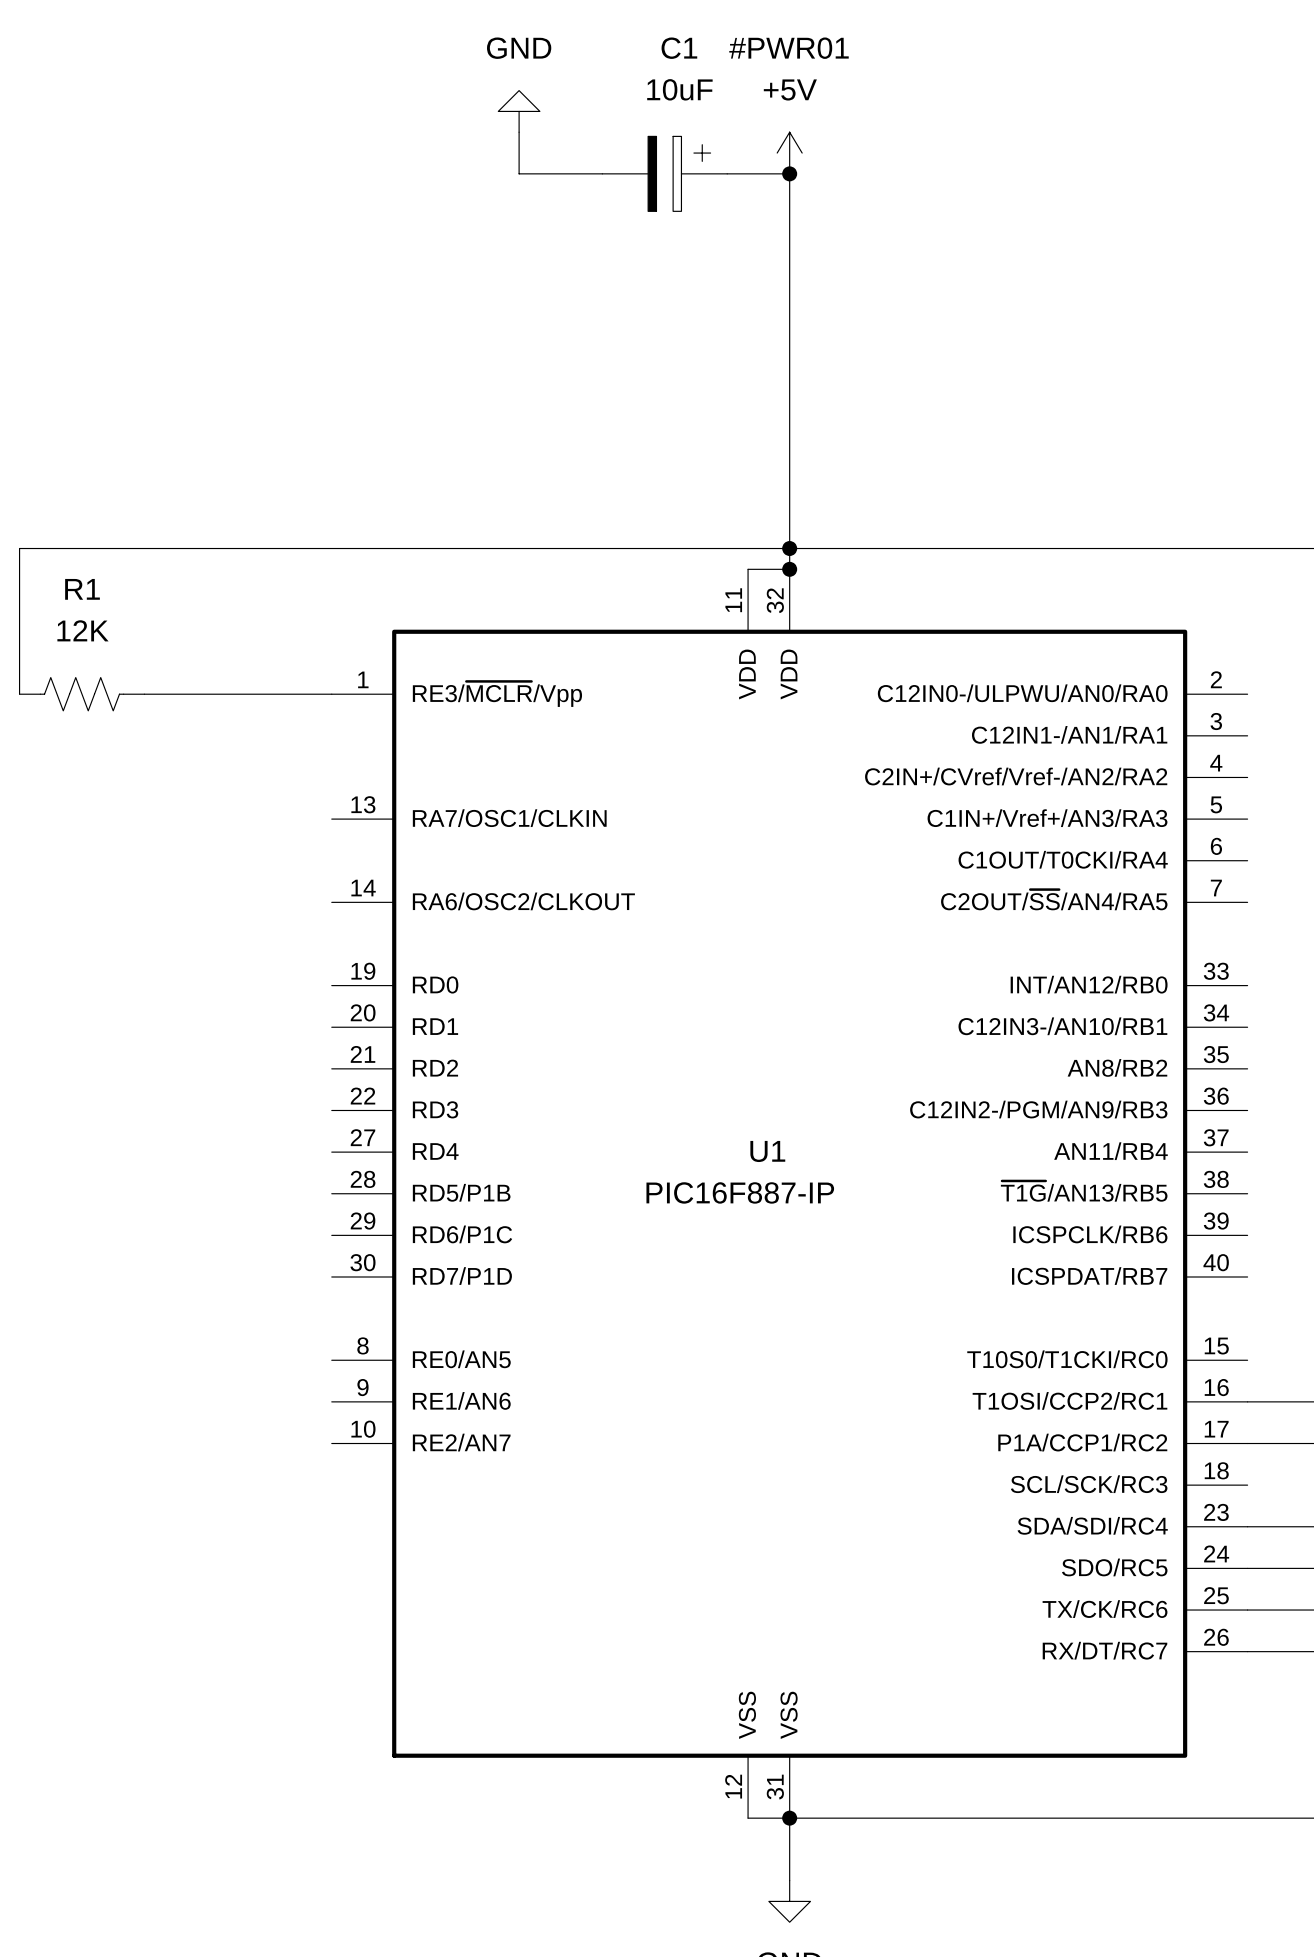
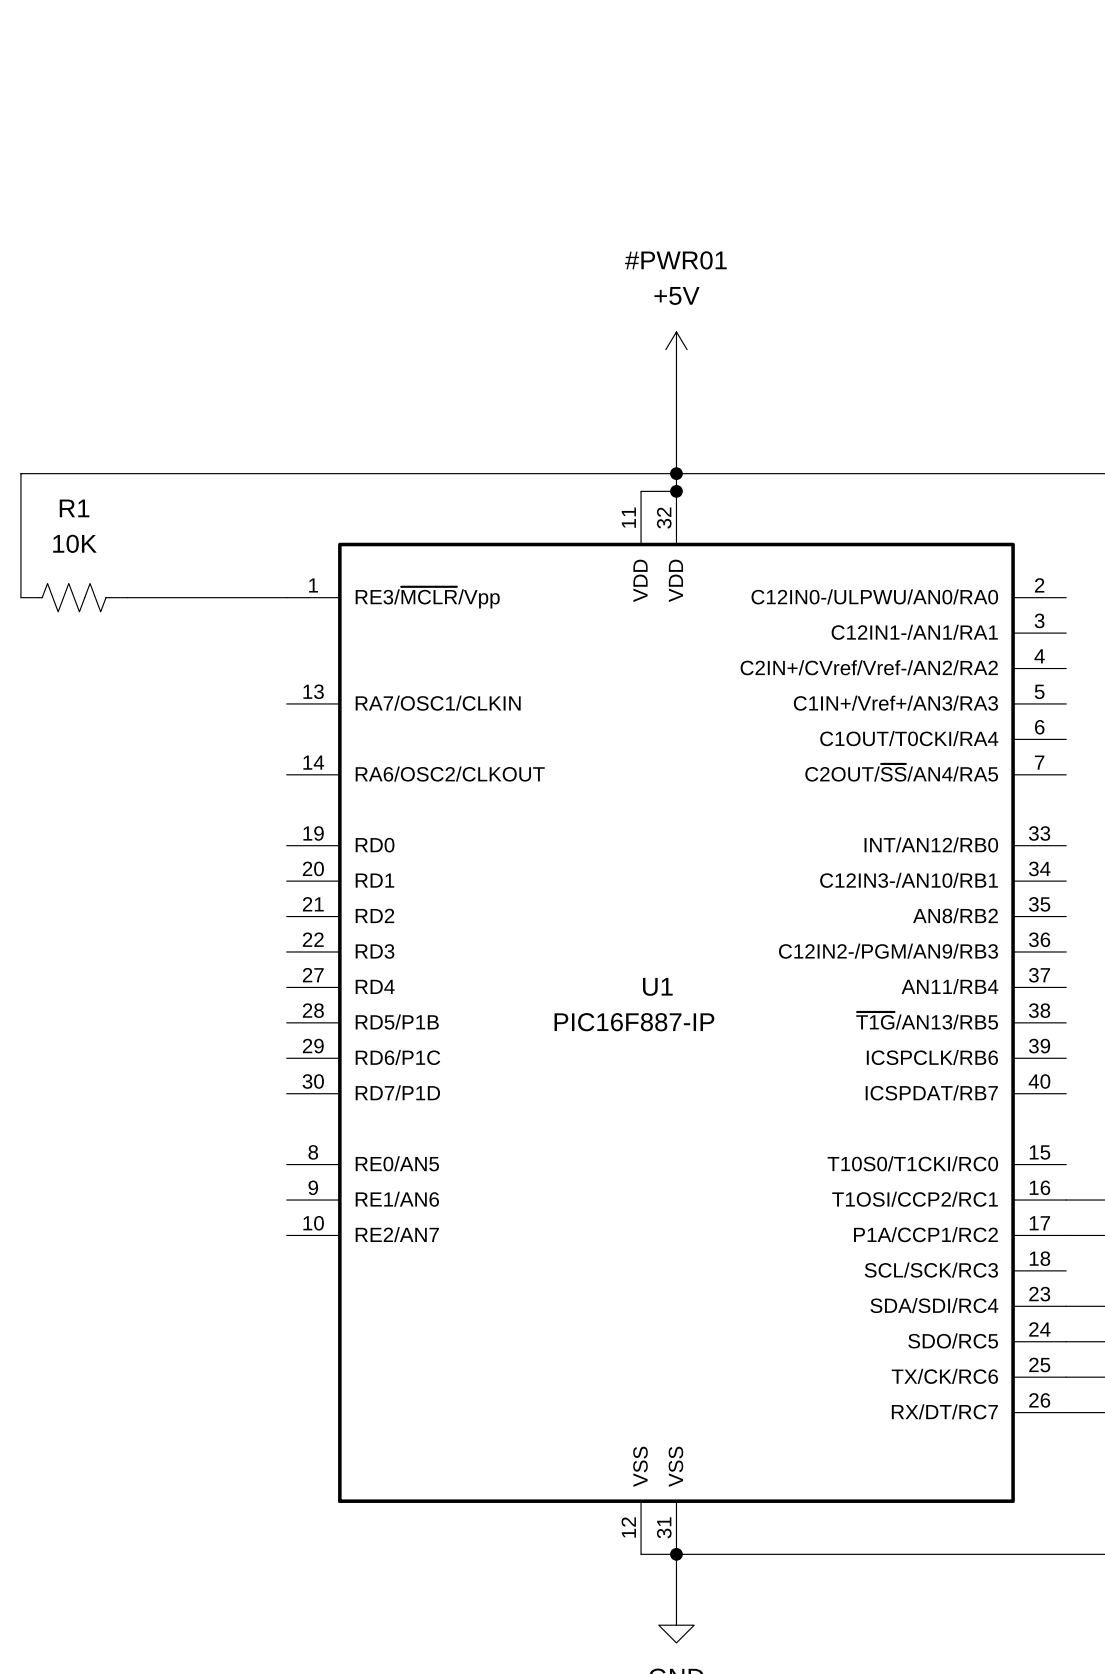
power symbol: GND (519, 111) -> none
wire: (519, 132) (519, 173) (602, 173) -> none
#PWR01 position: +5V (789, 153) -> +5V (676, 349)
C1: 10uF (664, 173) -> none
wire: (727, 173) (789, 173) (789, 423) -> none
junction: (789, 173) -> none
R1 value: 12K (82, 630) -> 10K (74, 543)

